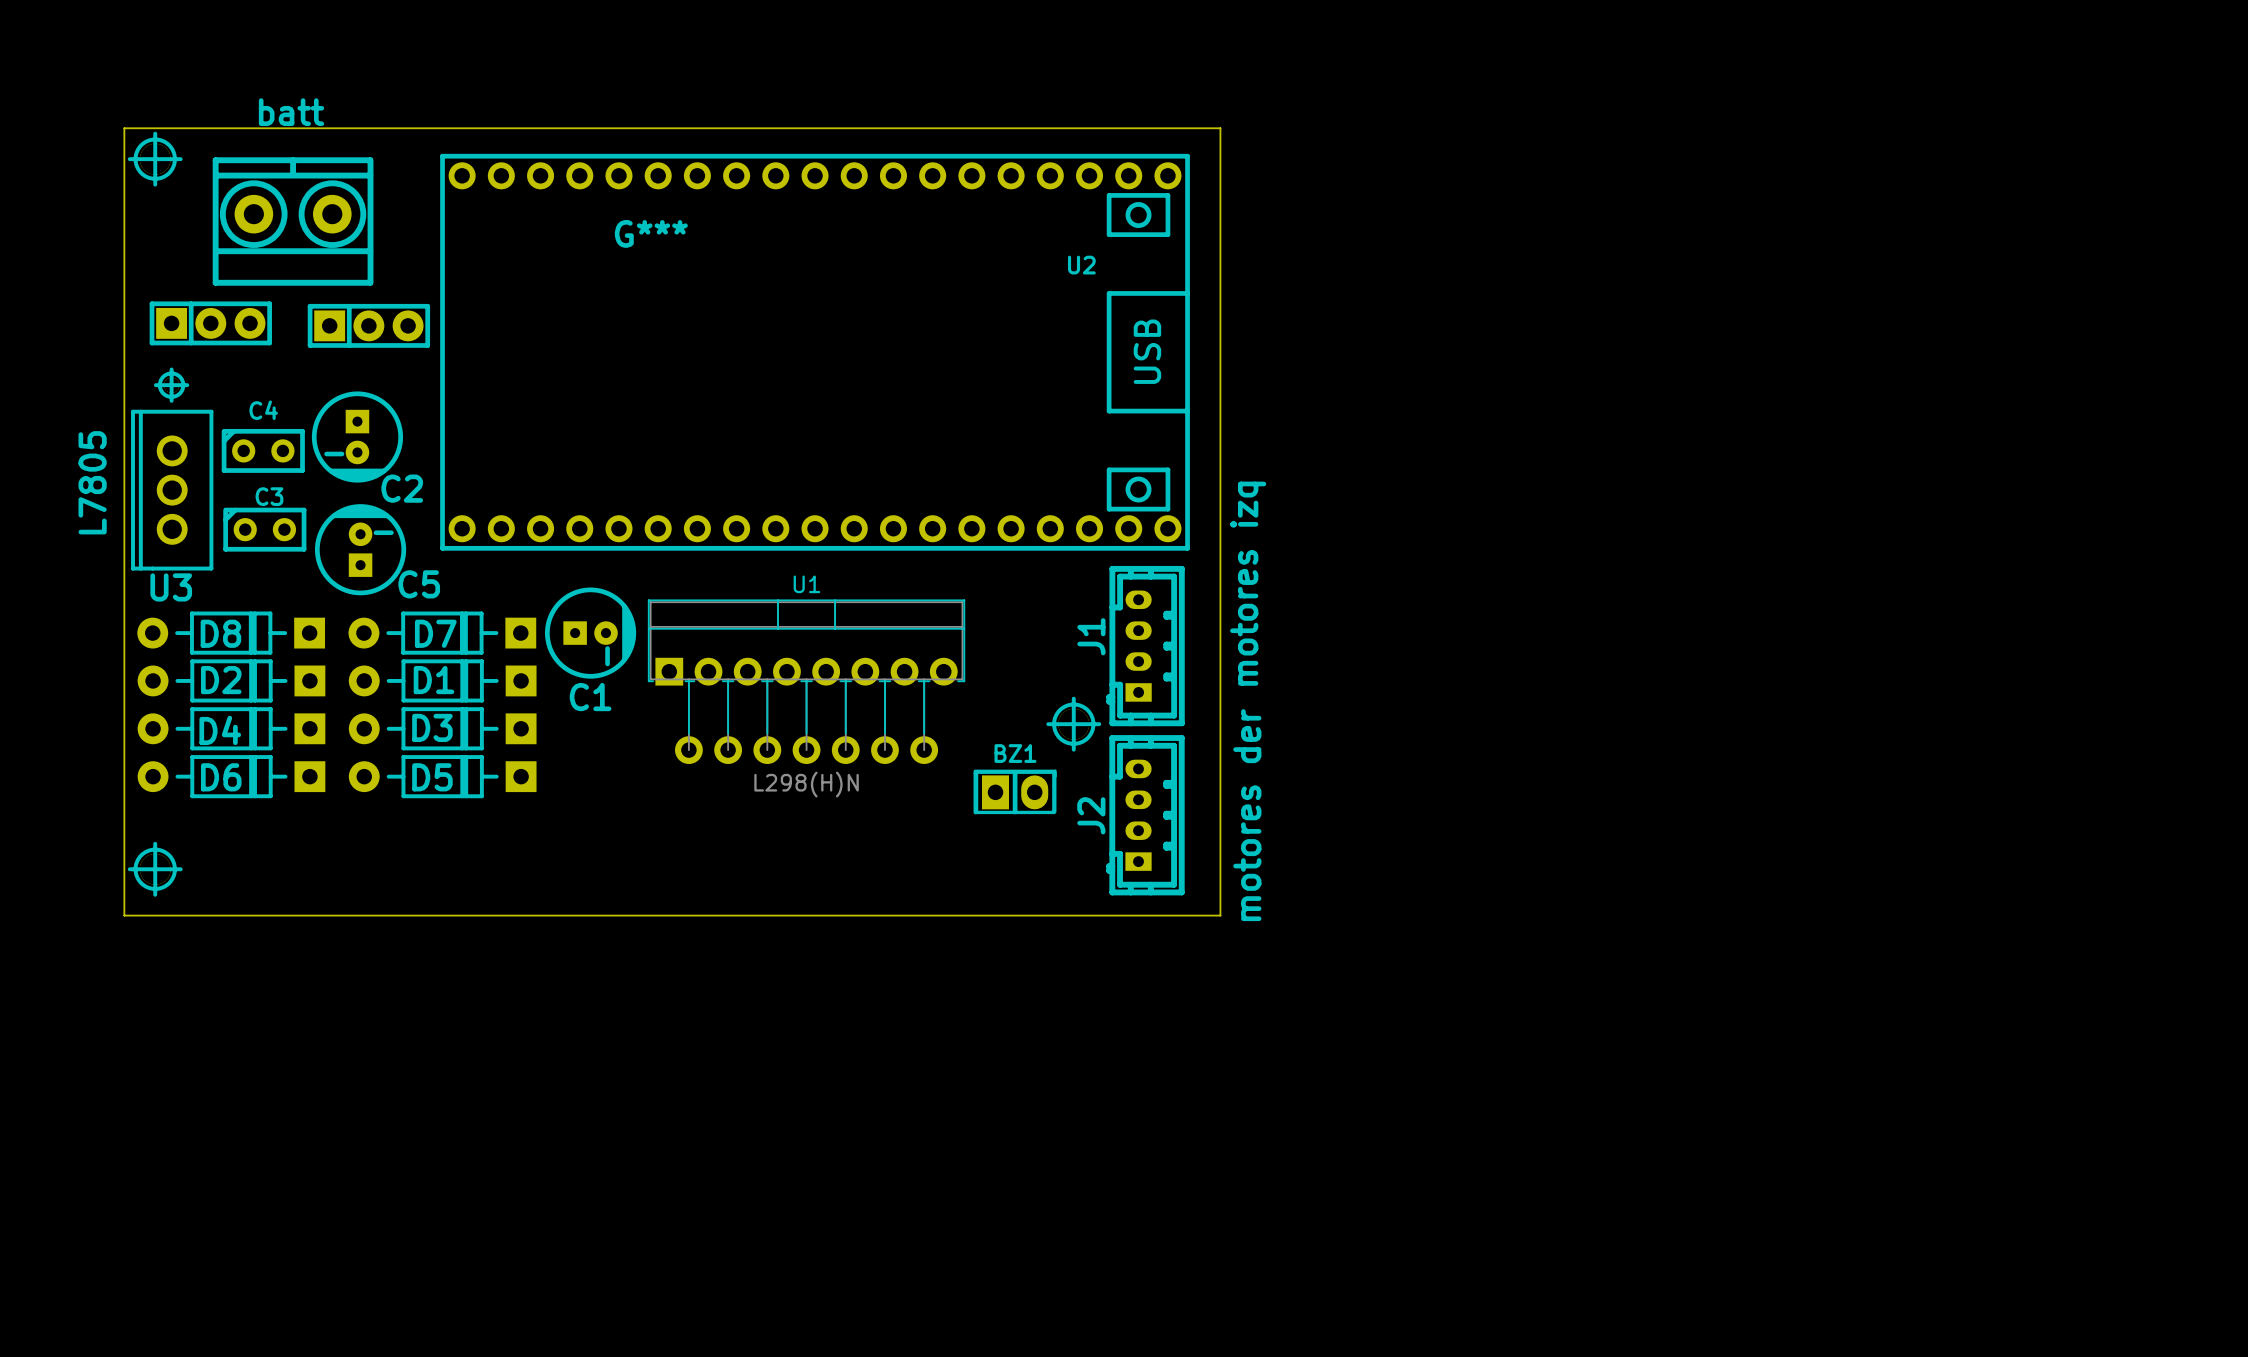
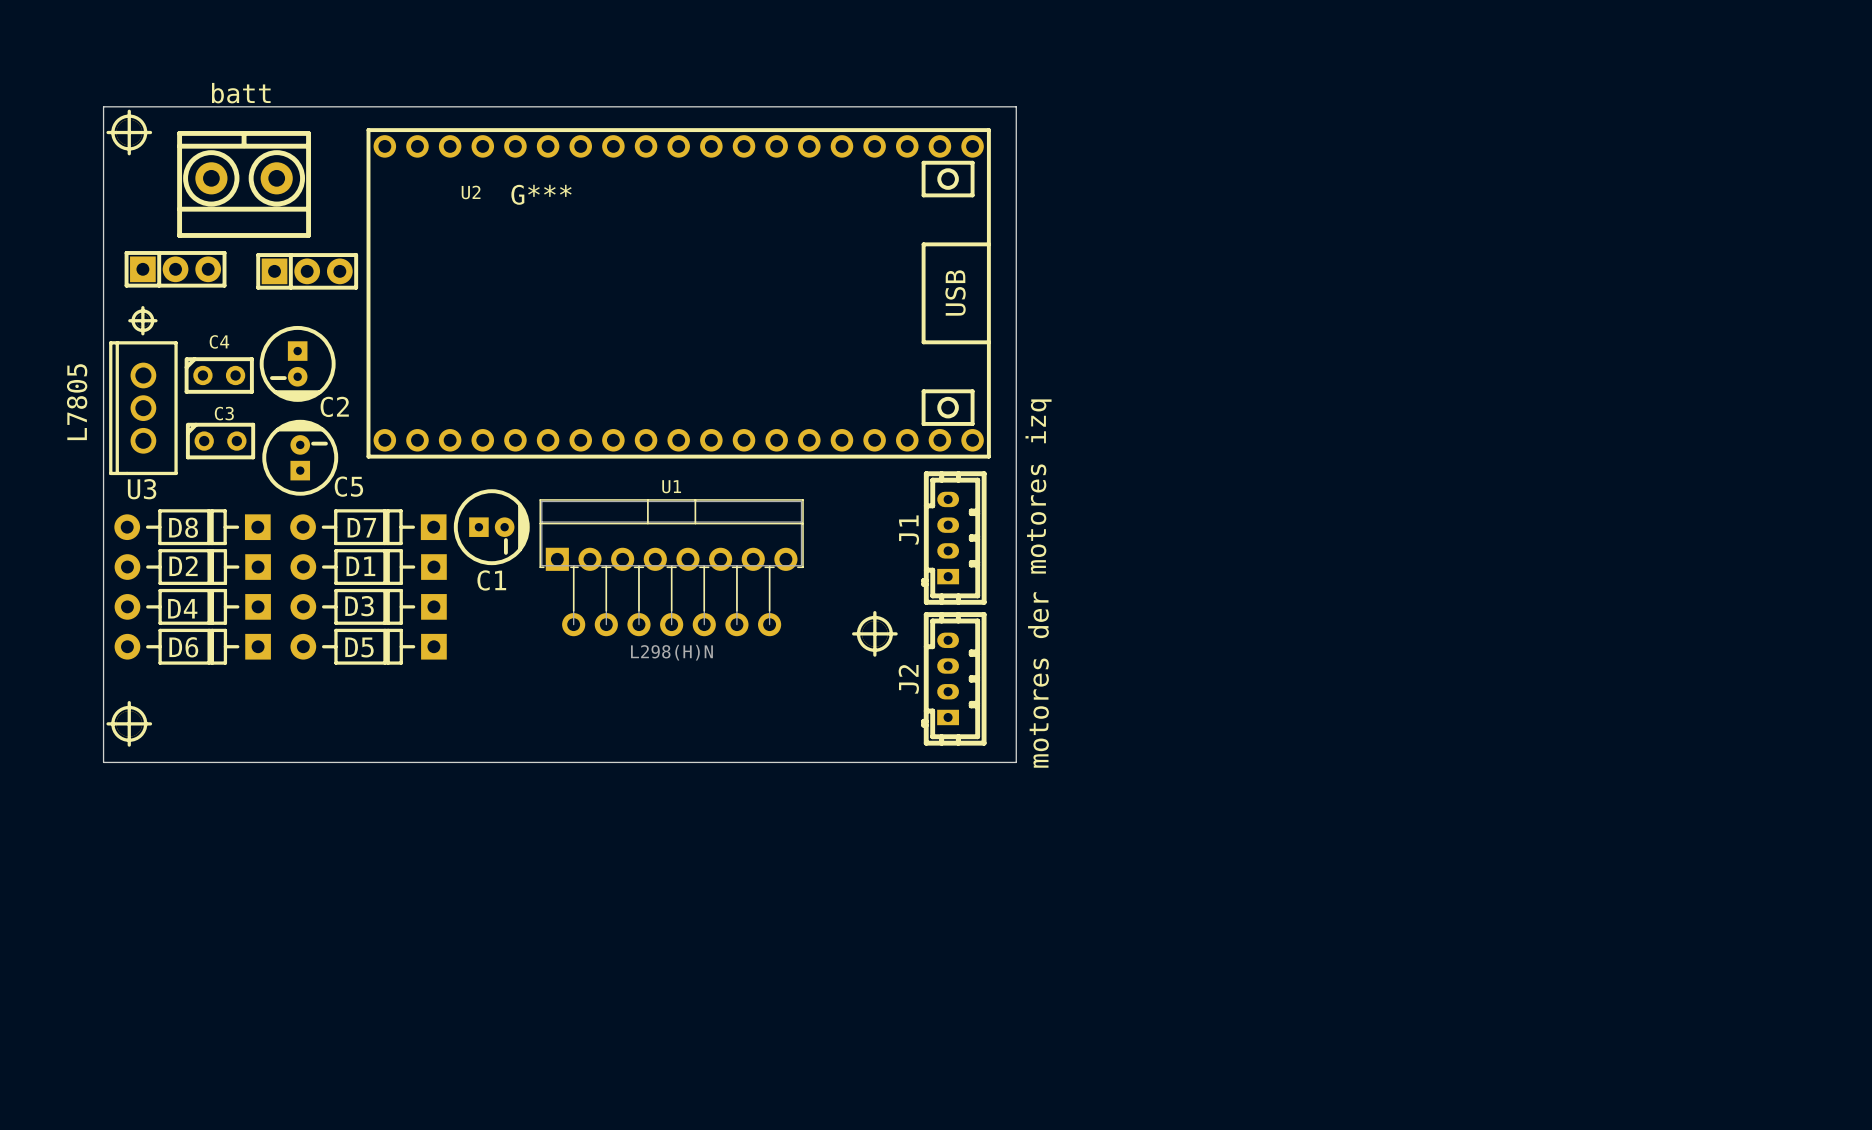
U2 name position: U2 (1081, 265) -> U2 (471, 192)
part position: (1073, 724) -> (874, 633)
BZ1: (1015, 791) -> none

